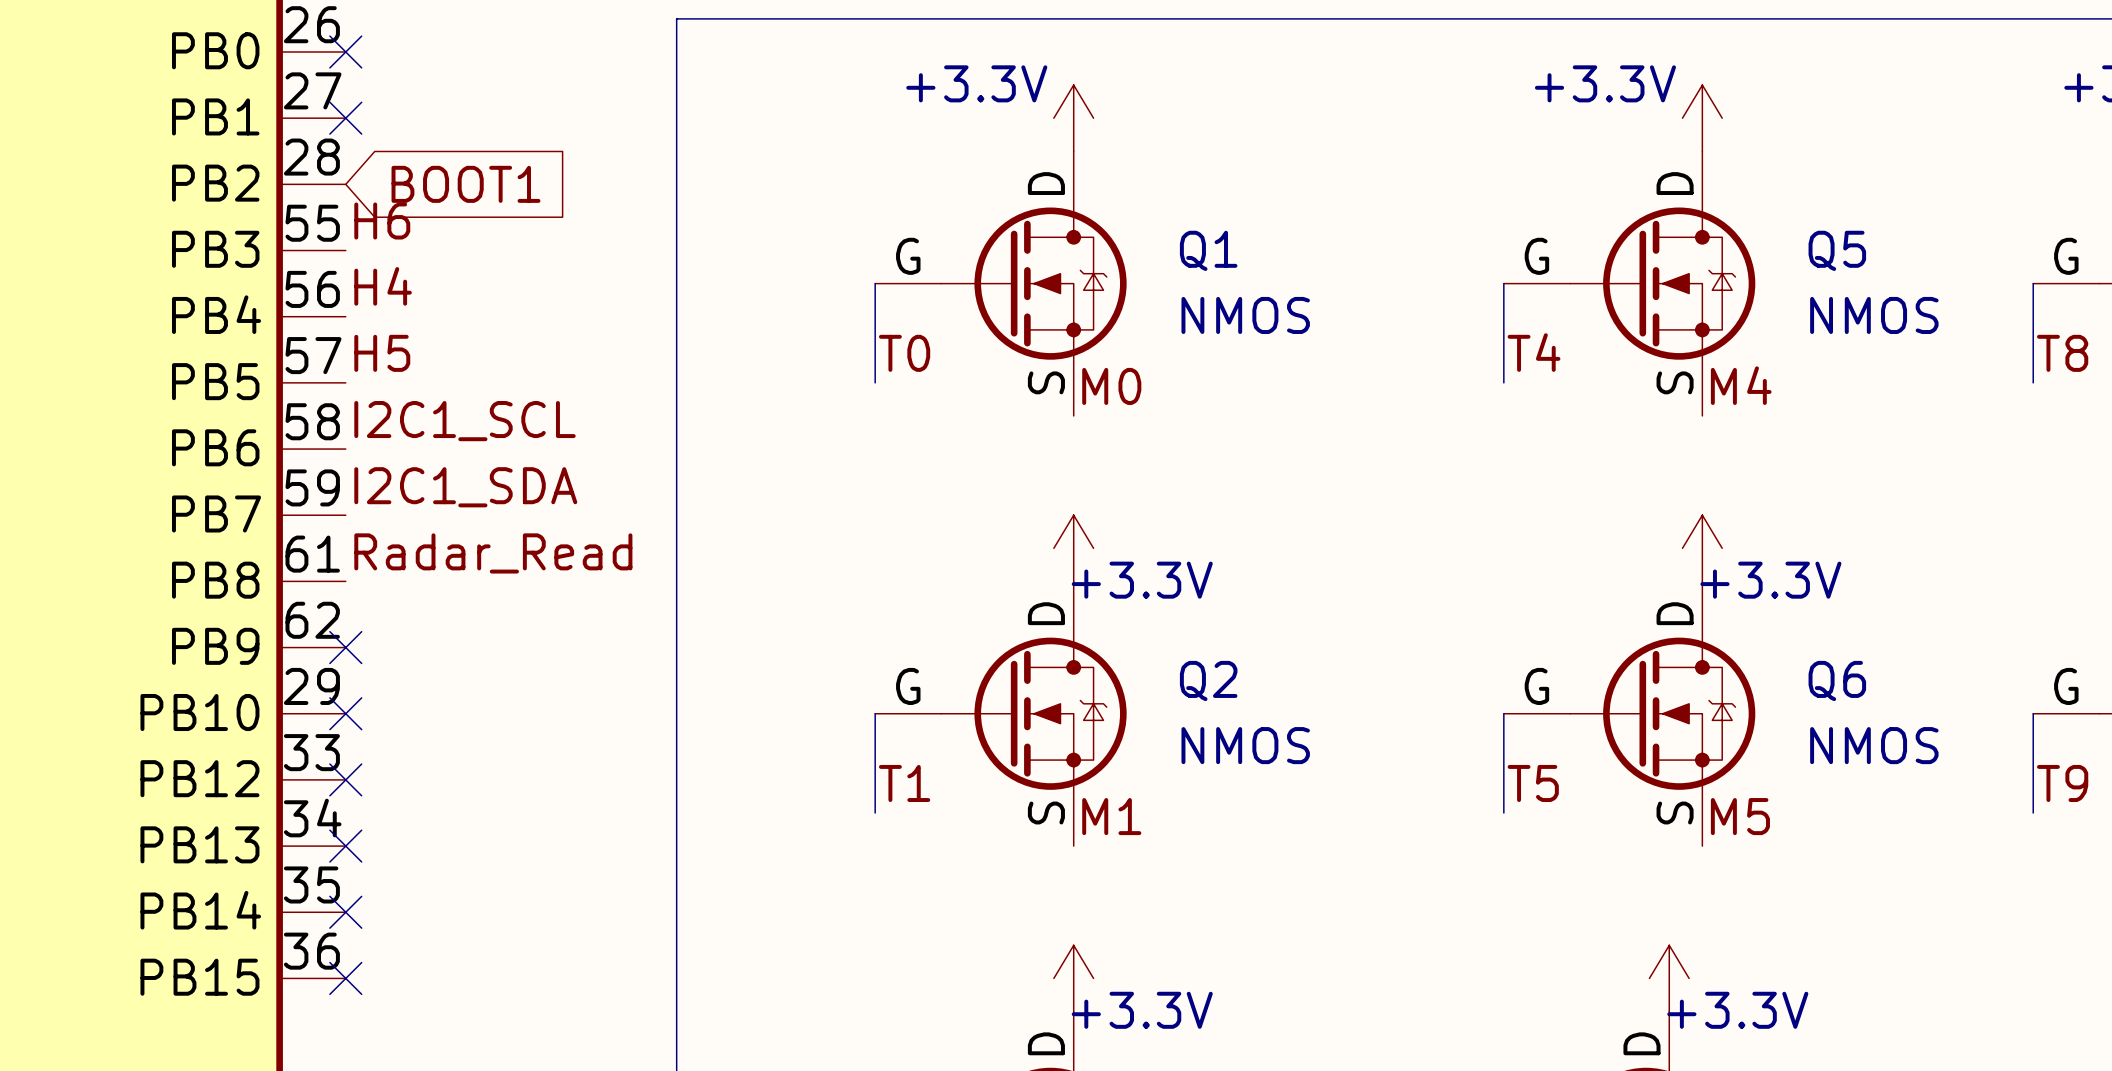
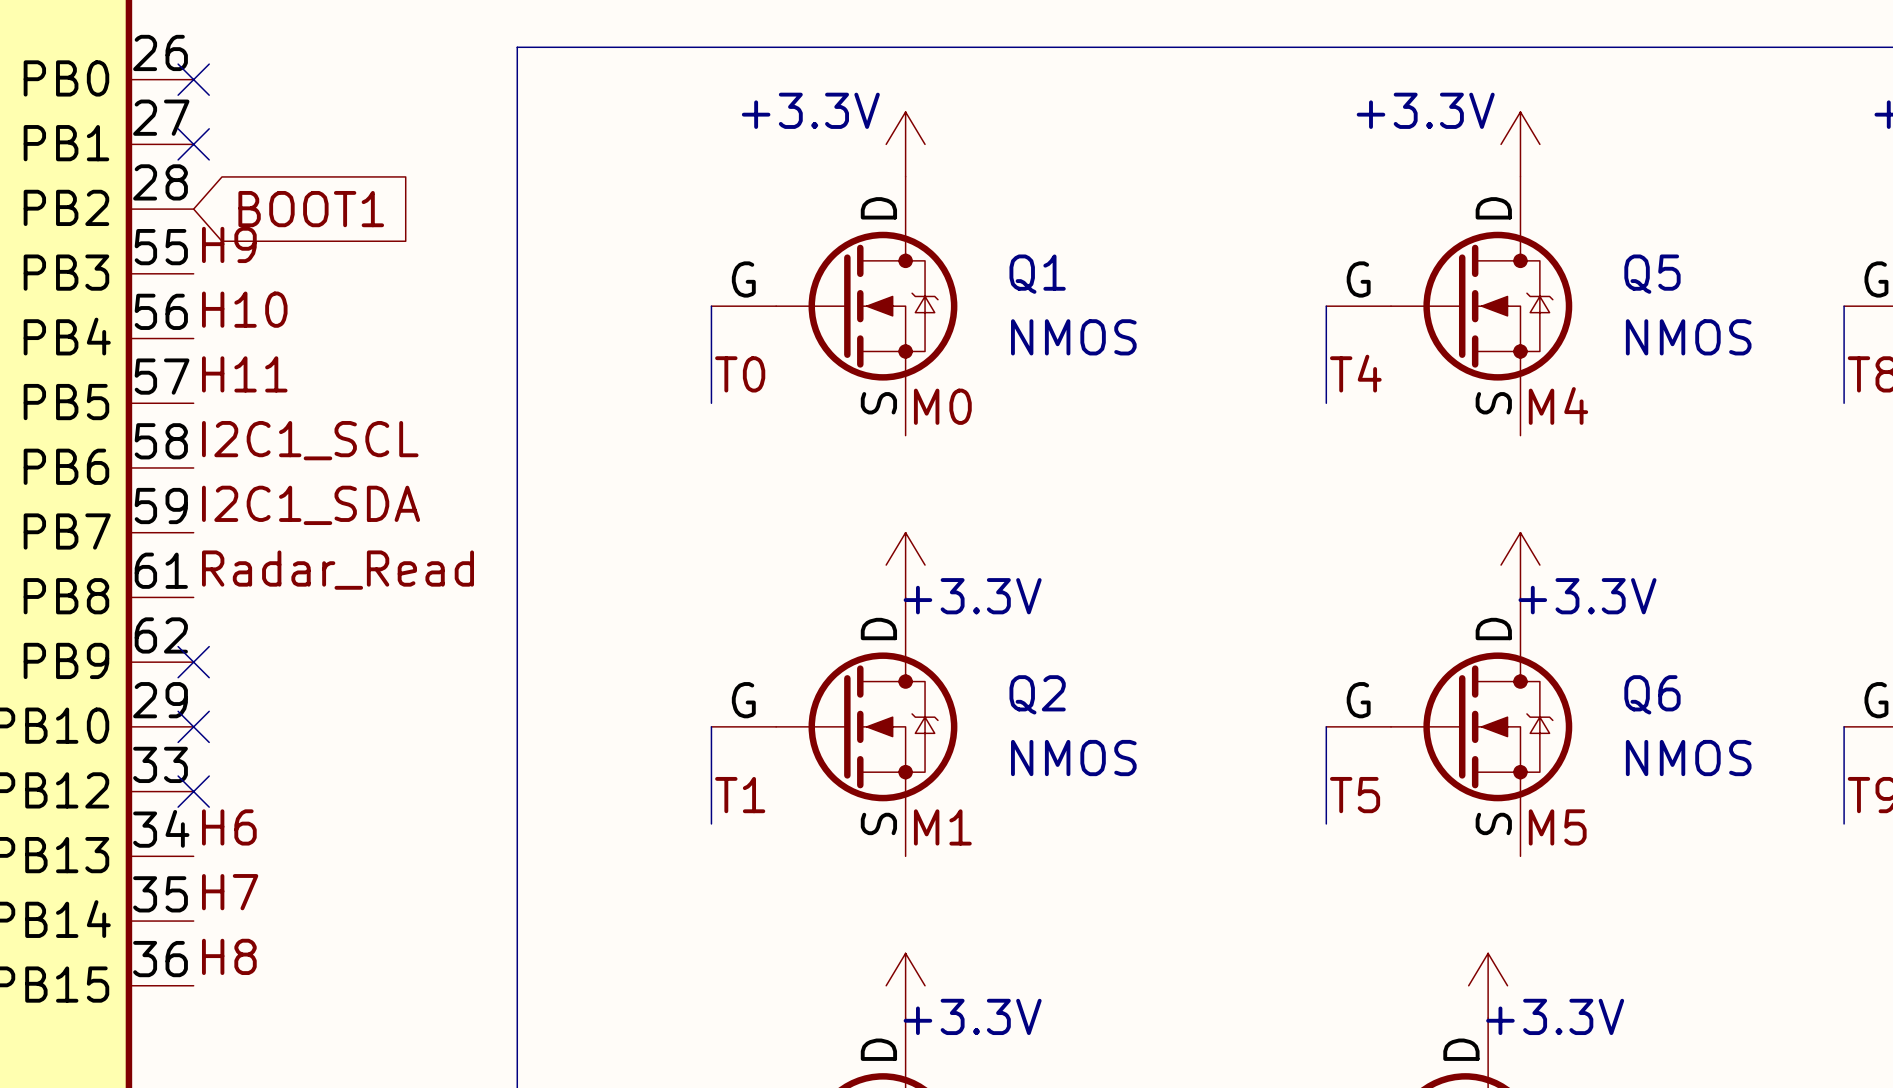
label: H6 (382, 221) -> H9 (229, 244)
label: H4 (383, 286) -> H10 (244, 309)
label: H5 (382, 353) -> H11 (244, 374)
label: none -> H6 (229, 827)
no-connect mark: (345, 846) -> none
label: none -> H7 (230, 892)
no-connect mark: (345, 912) -> none
label: none -> H8 (229, 956)
no-connect mark: (345, 978) -> none

